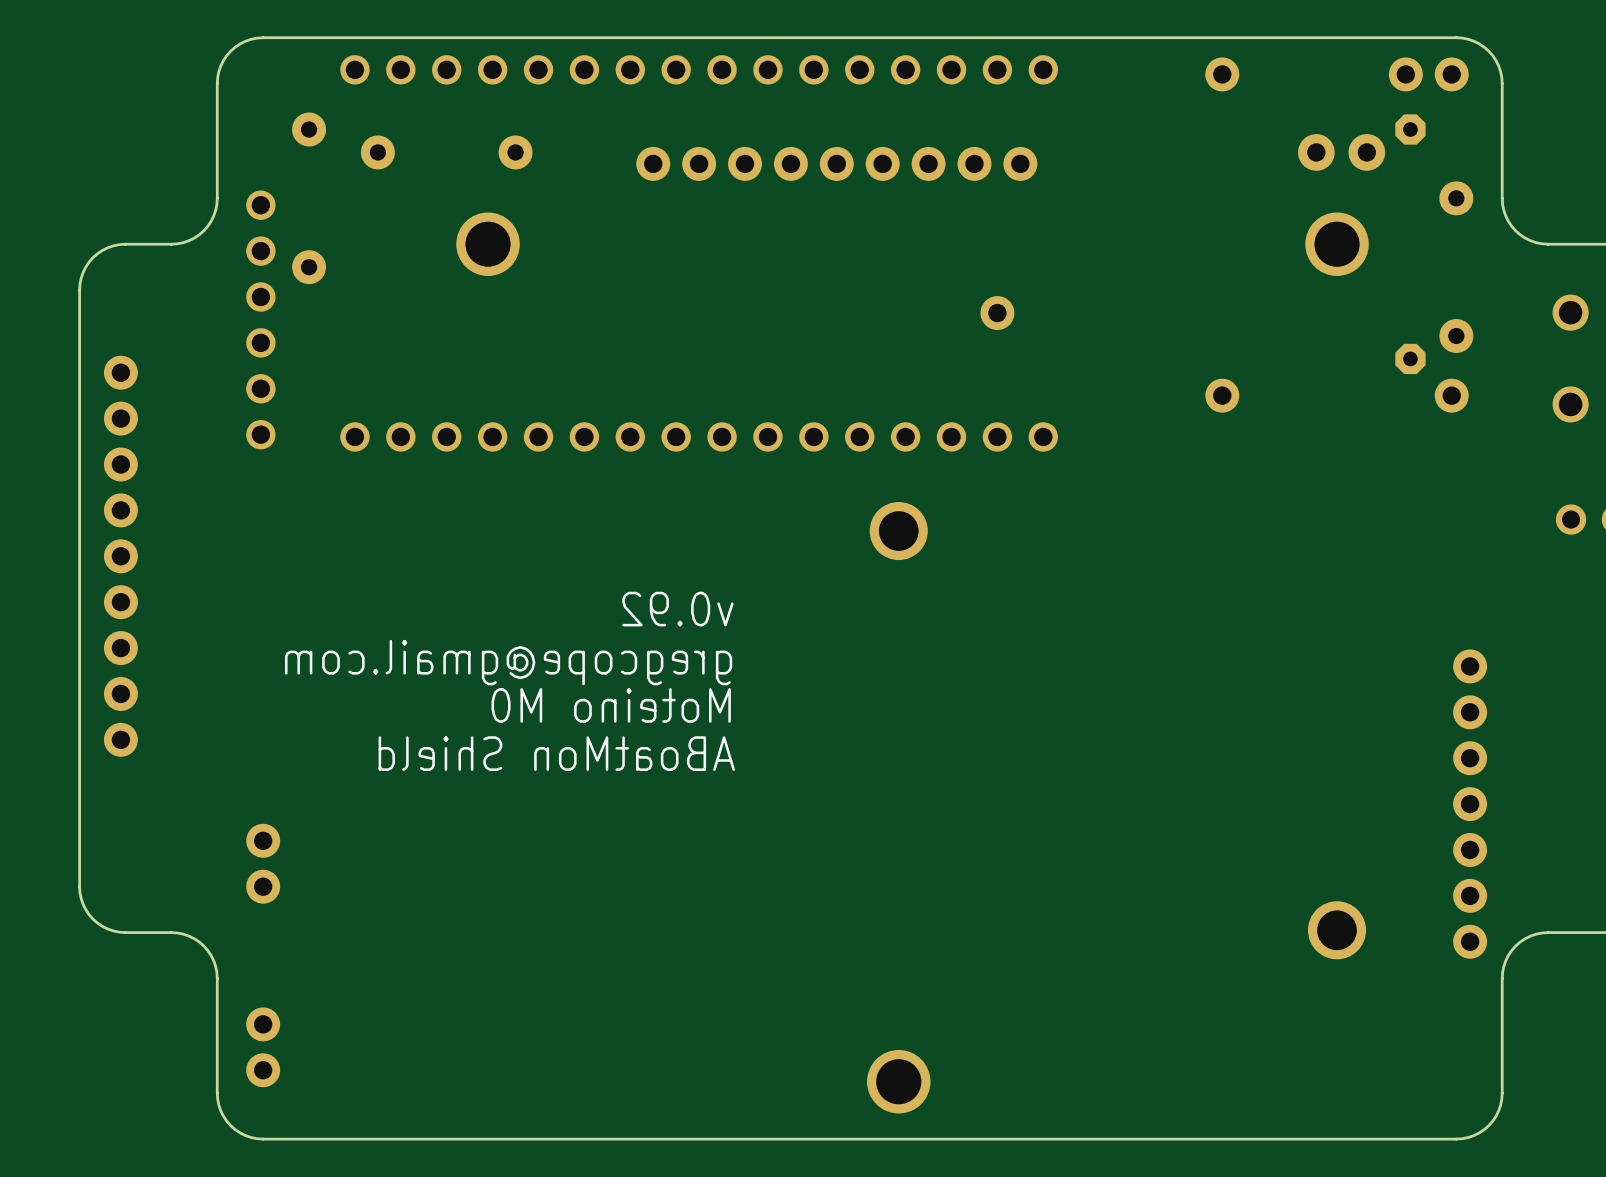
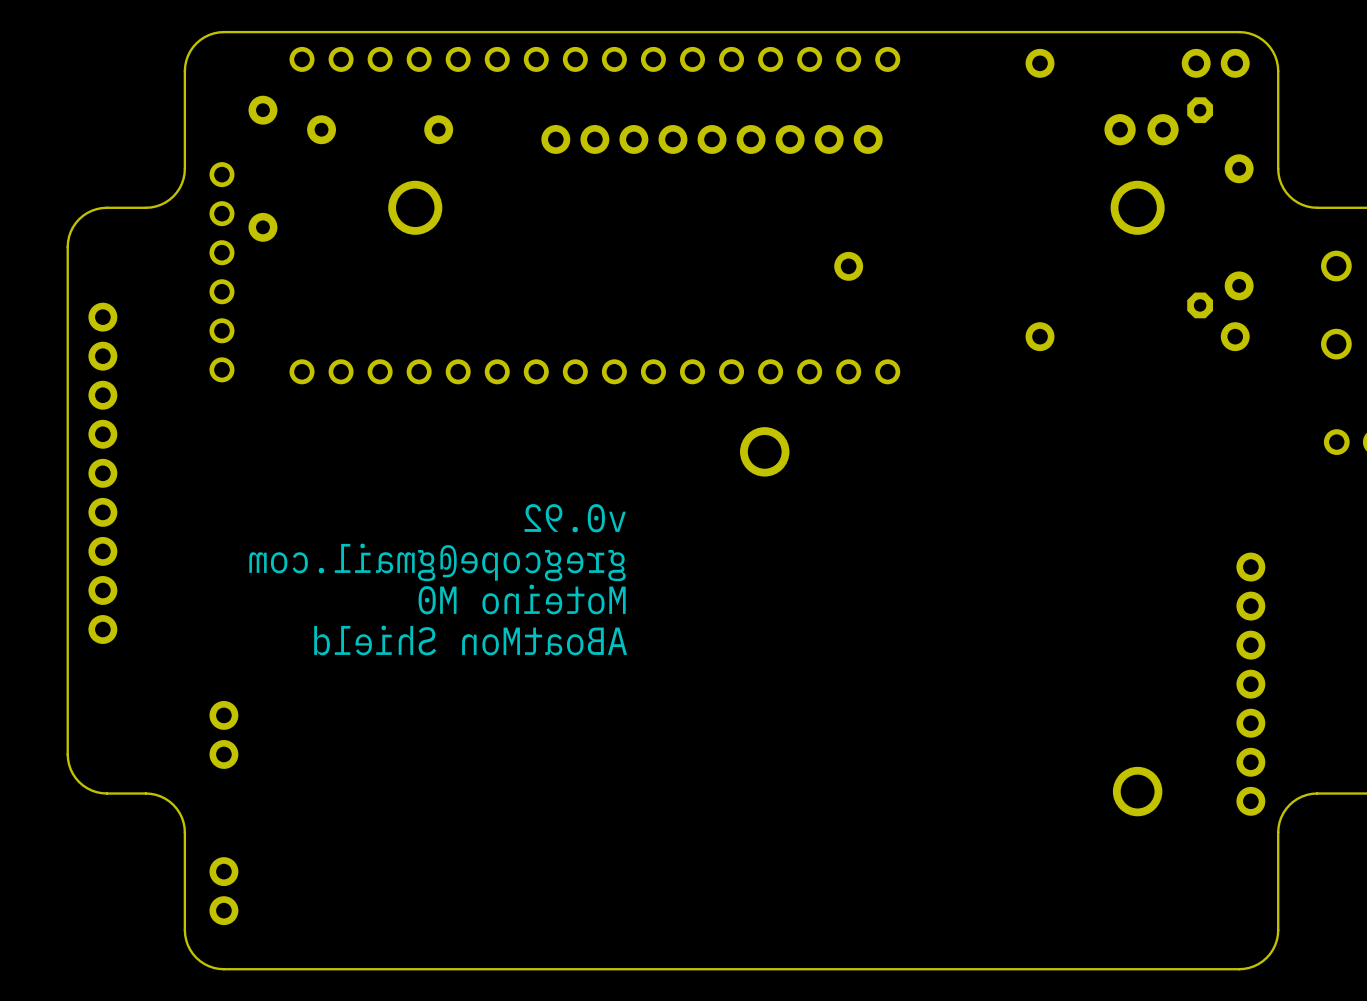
part: (898, 1081) -> none

